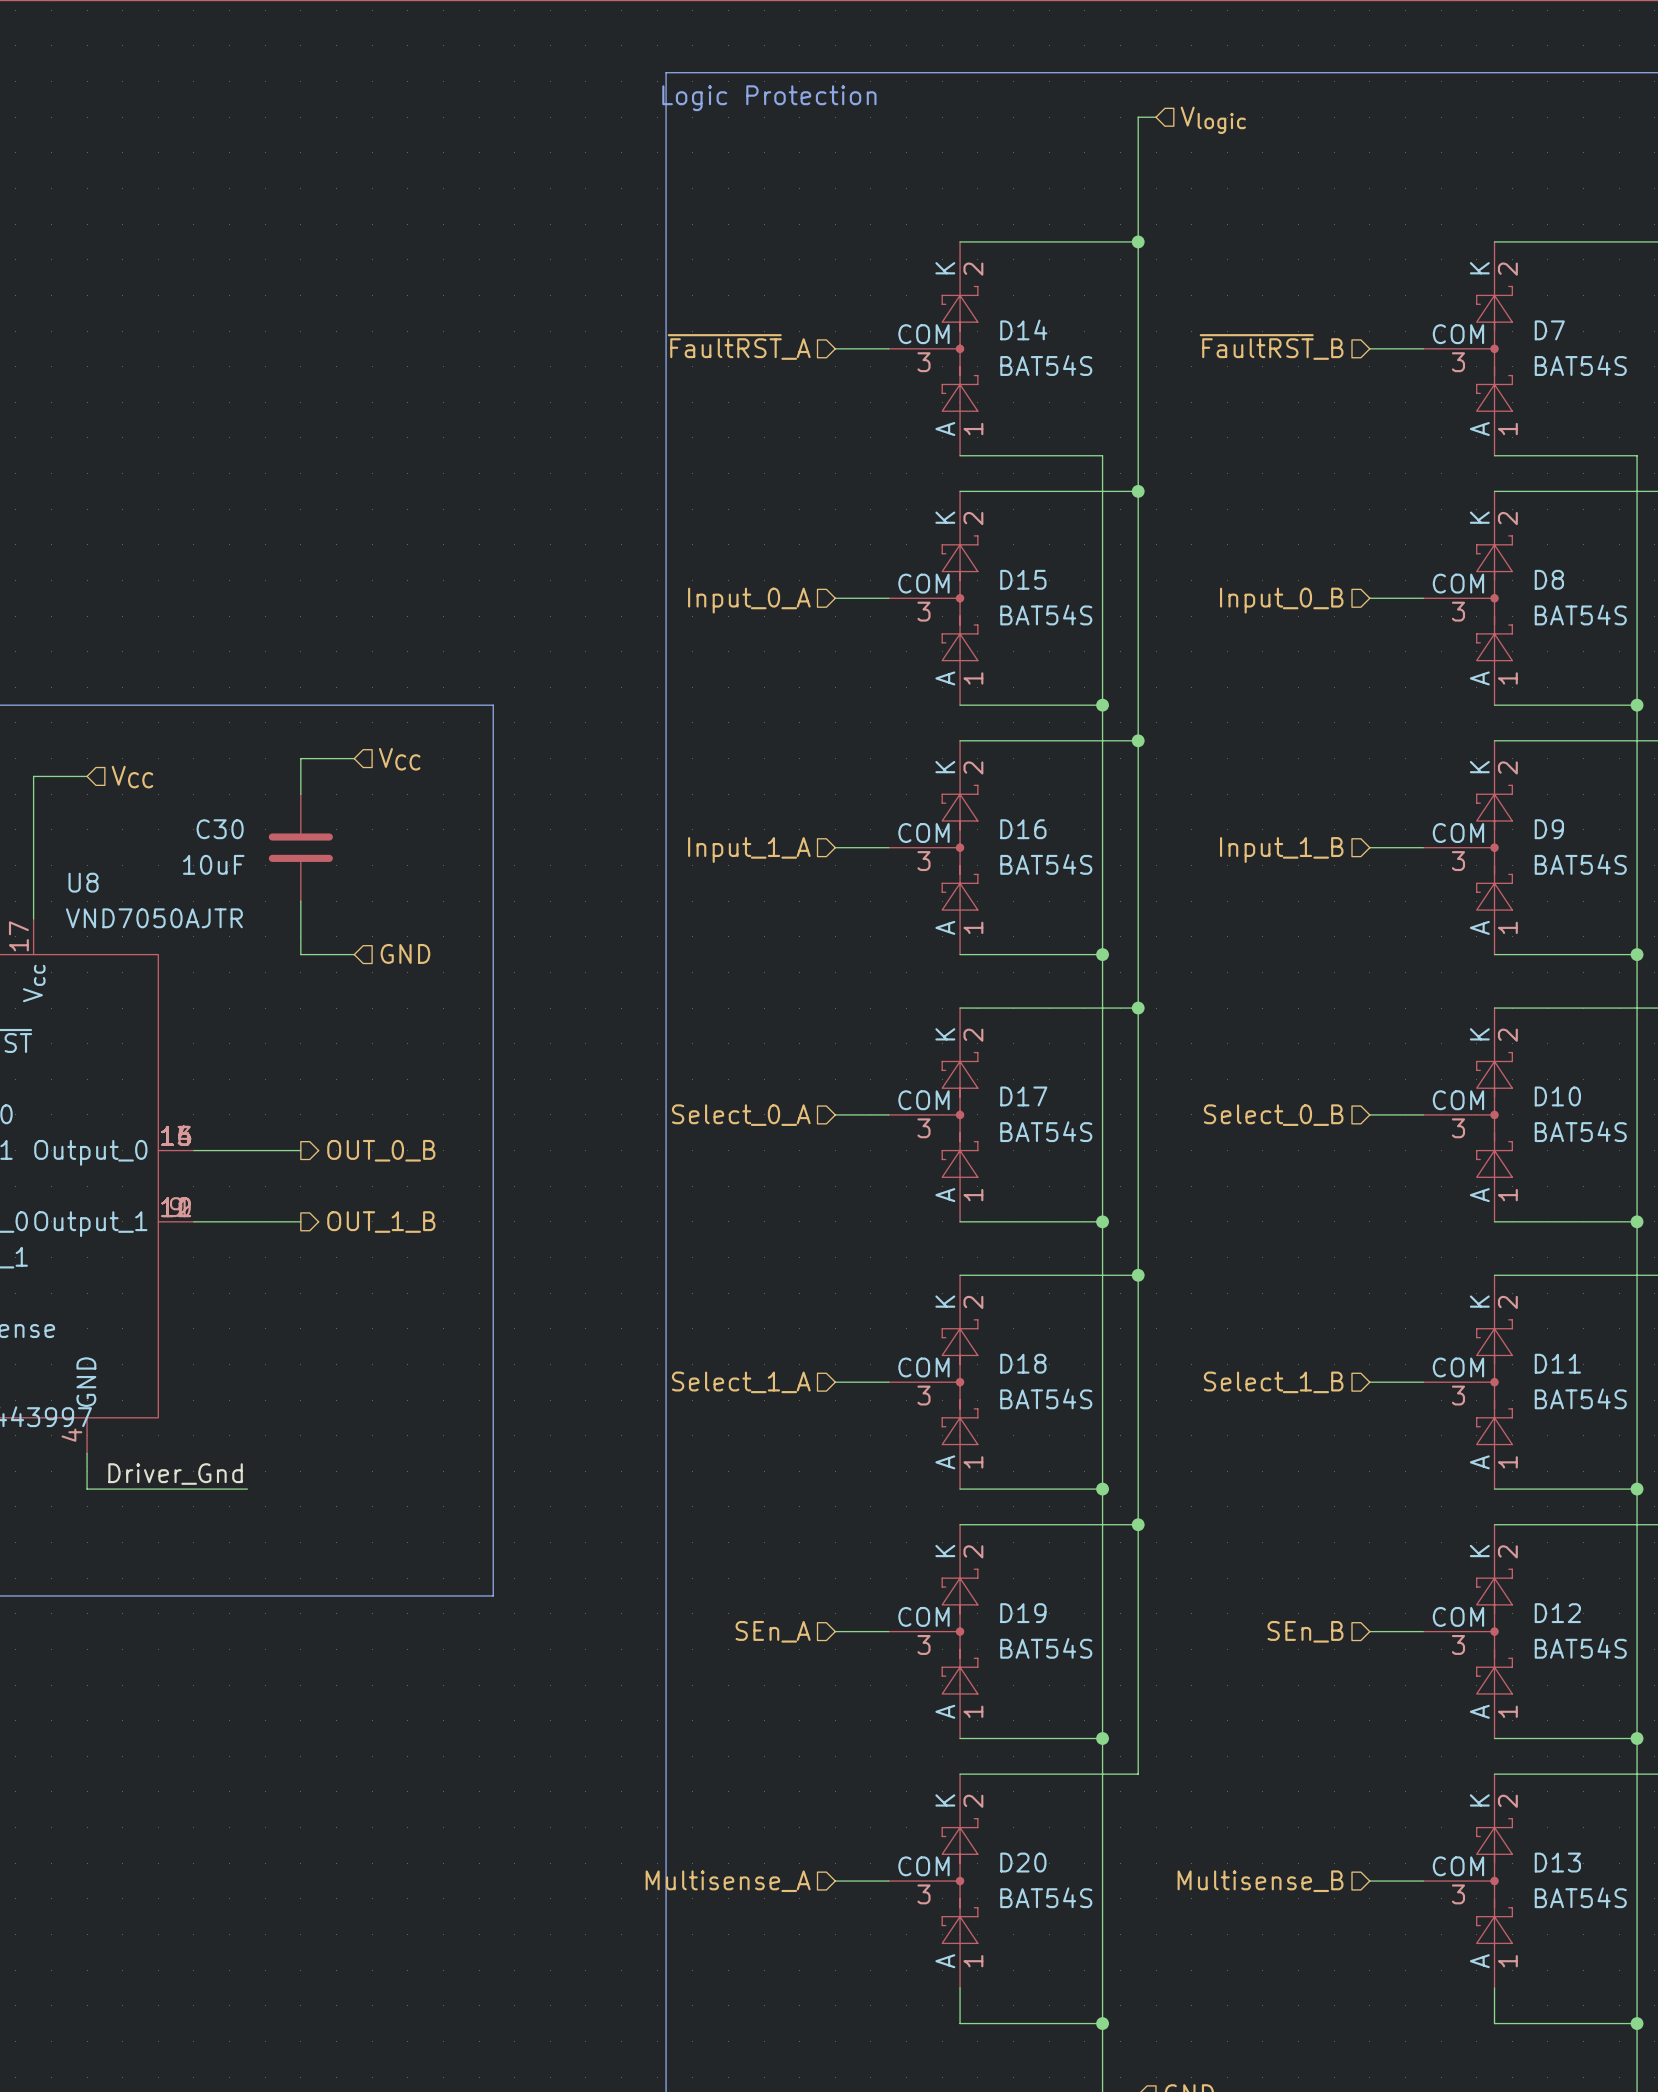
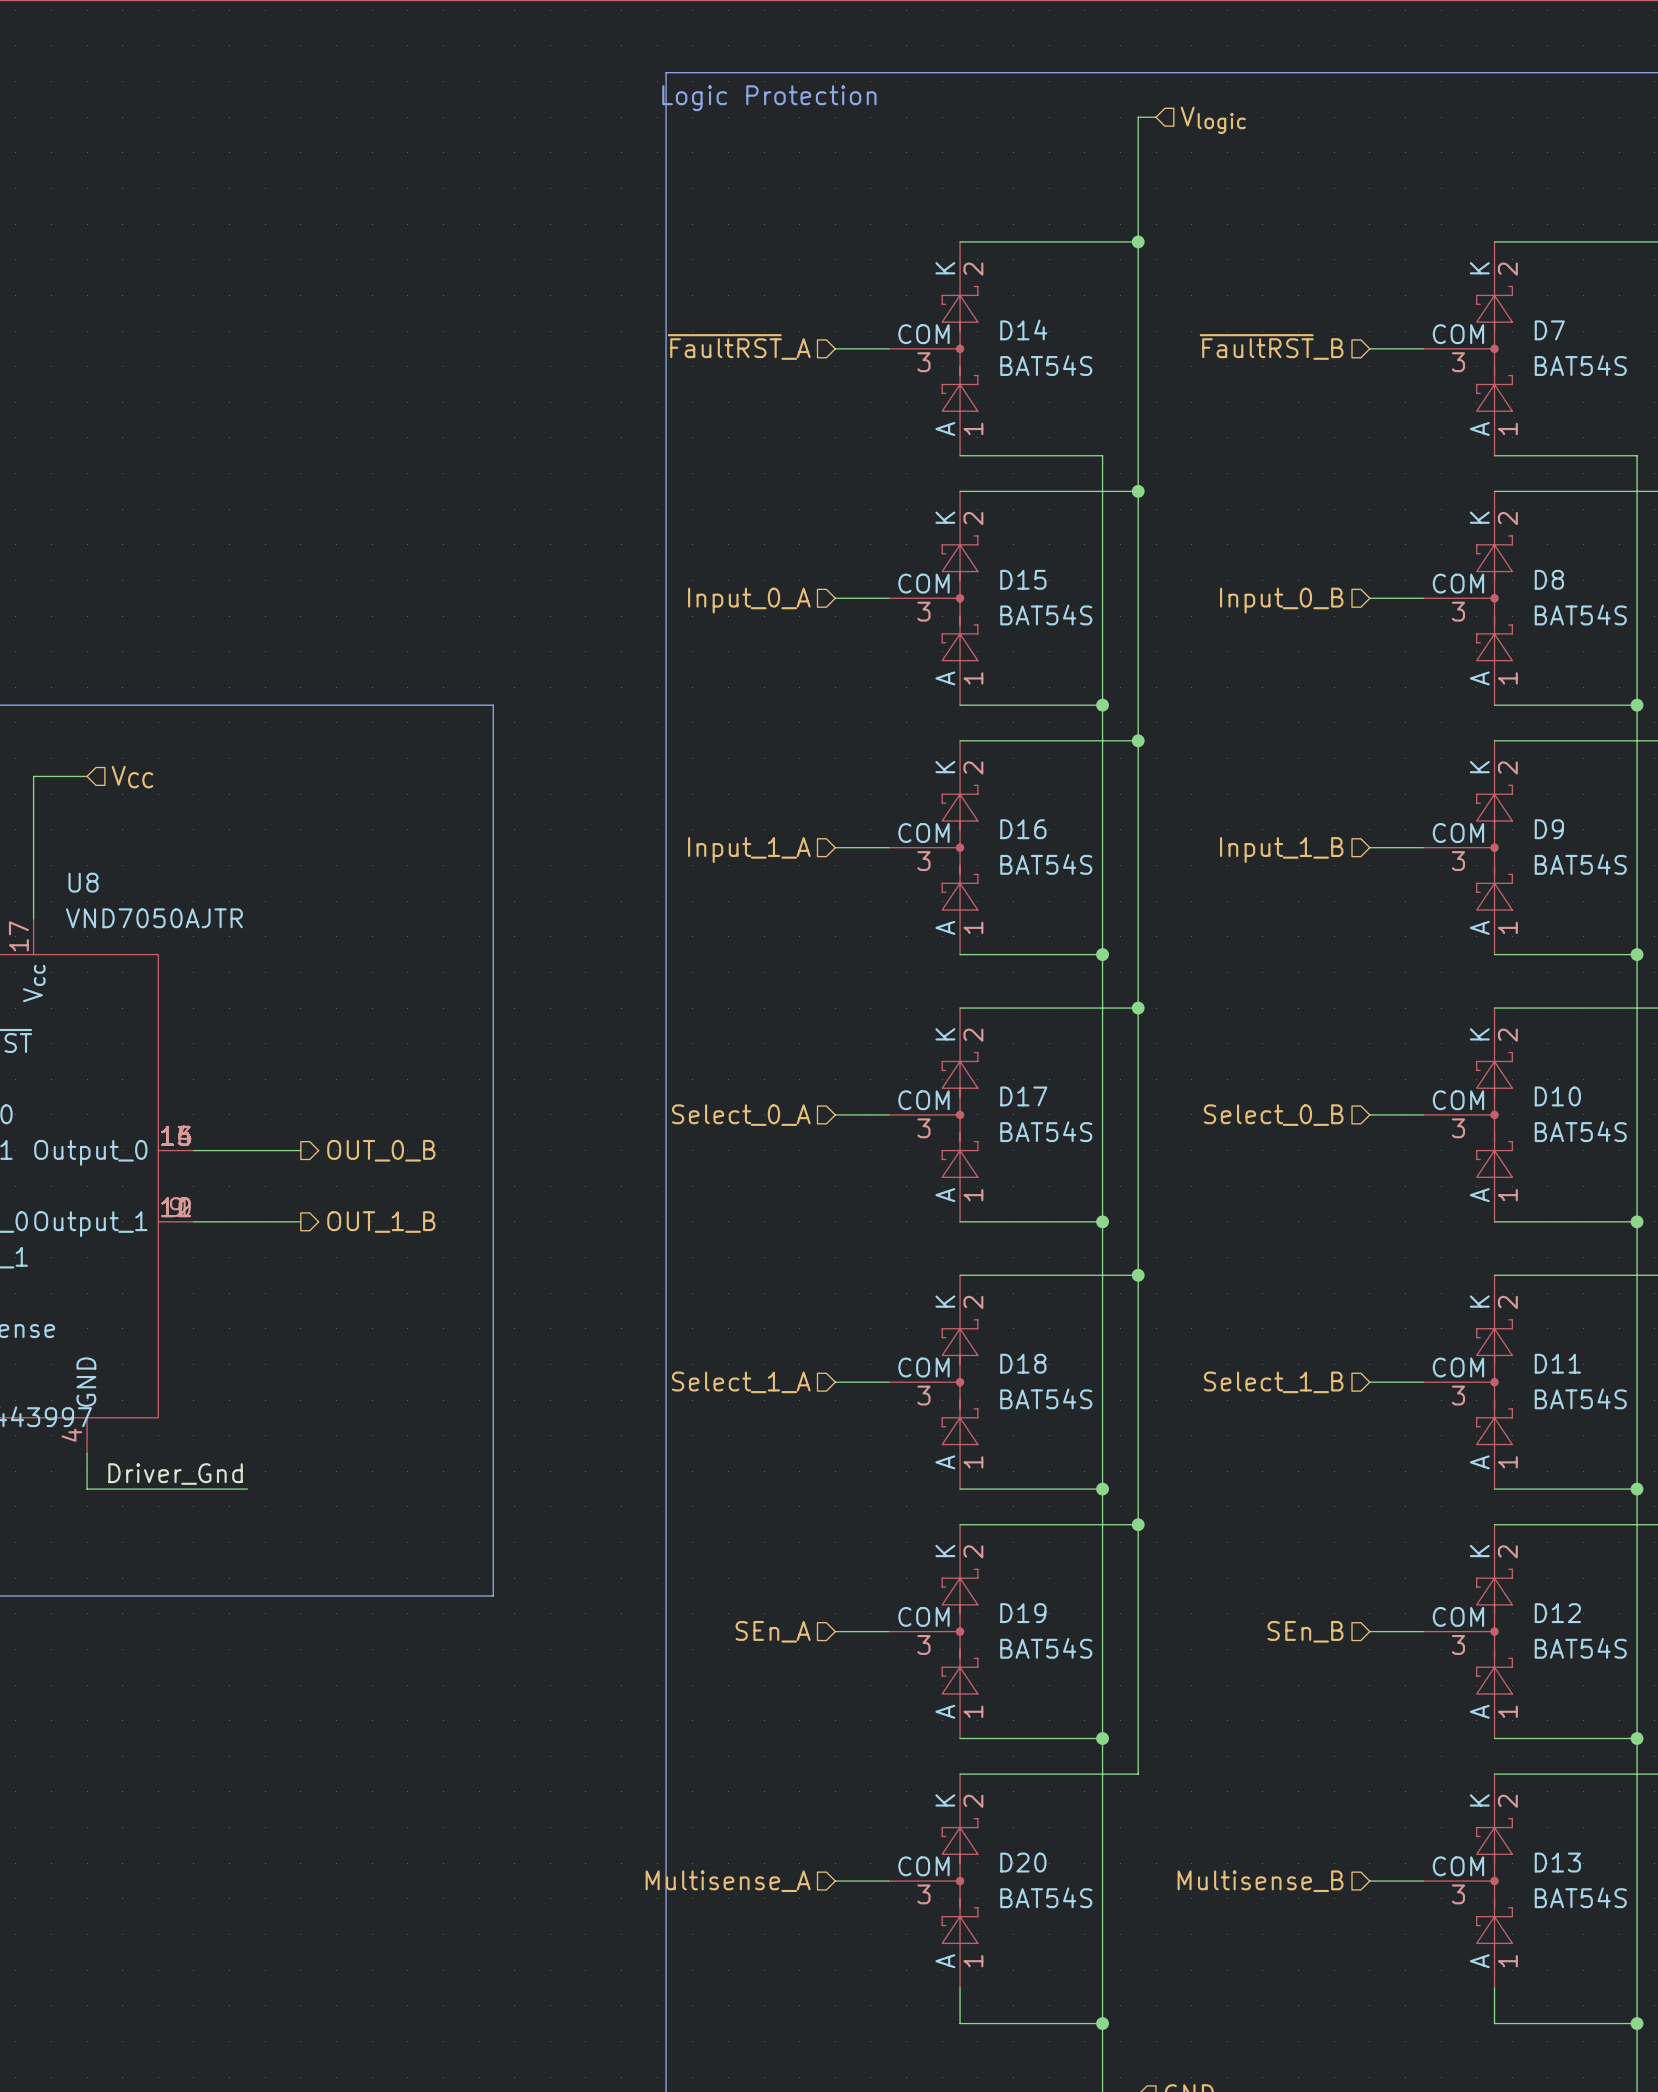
wire: (354, 758) (300, 758) (300, 794) -> none
hierarchical label: VCC (399, 759) -> none
C30: 10uF (300, 847) -> none
wire: (300, 901) (300, 954) (354, 954) -> none
hierarchical label: GND (405, 953) -> none

